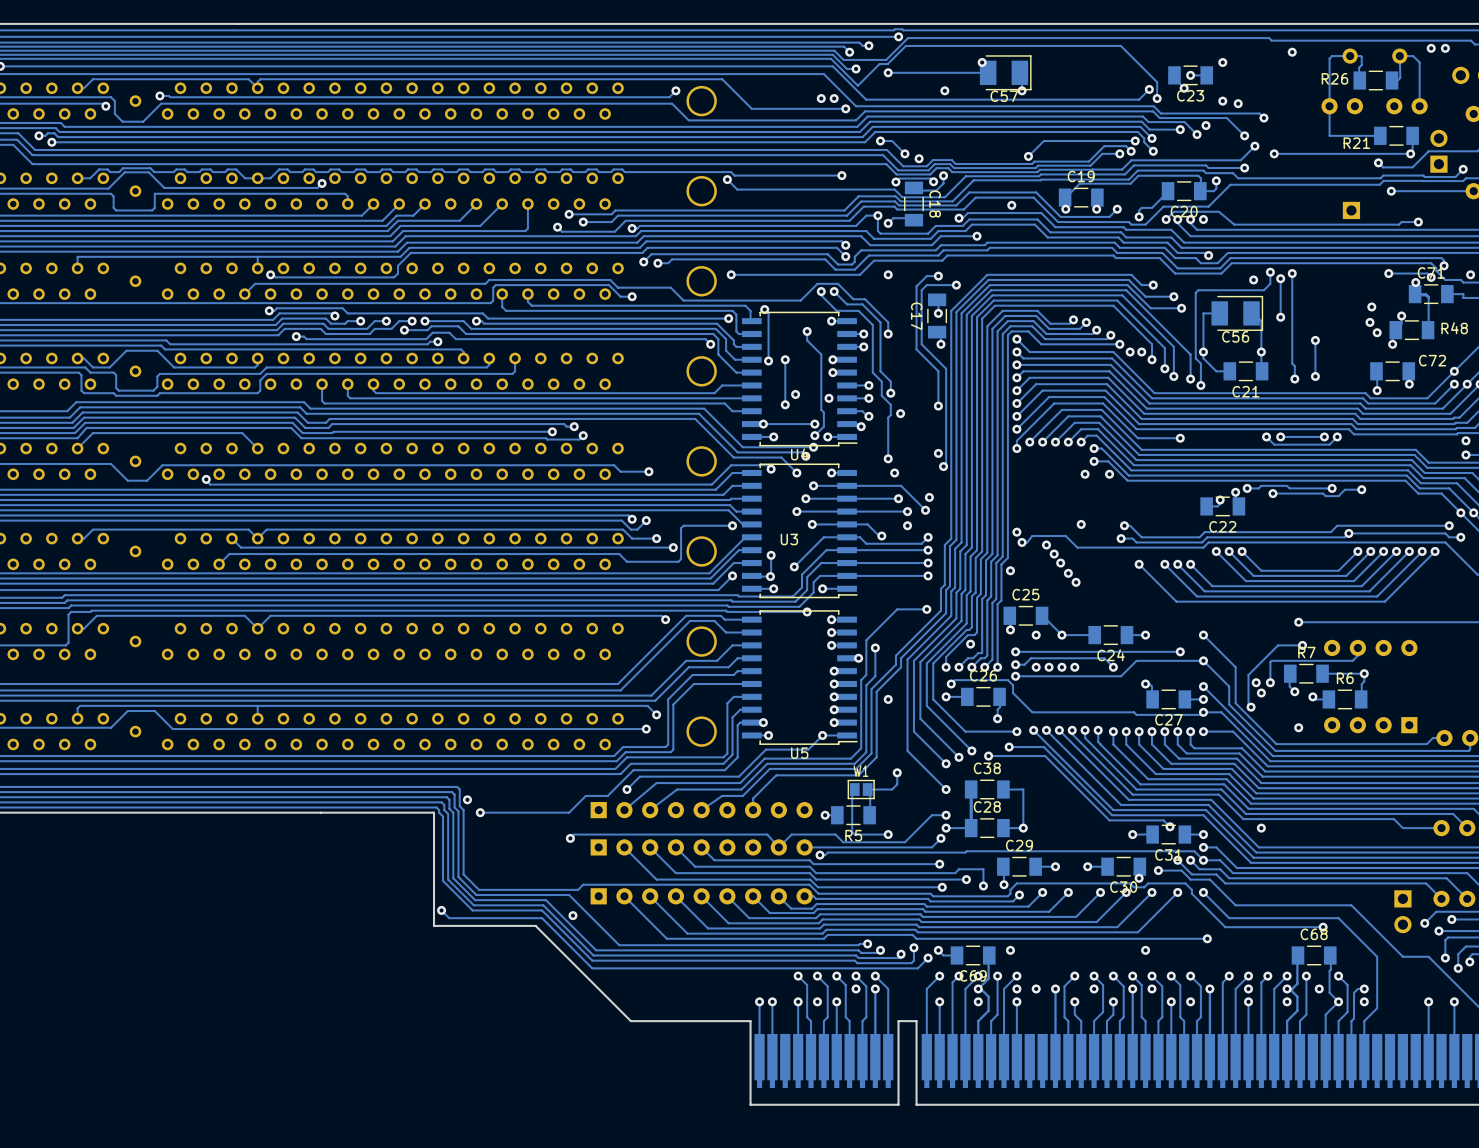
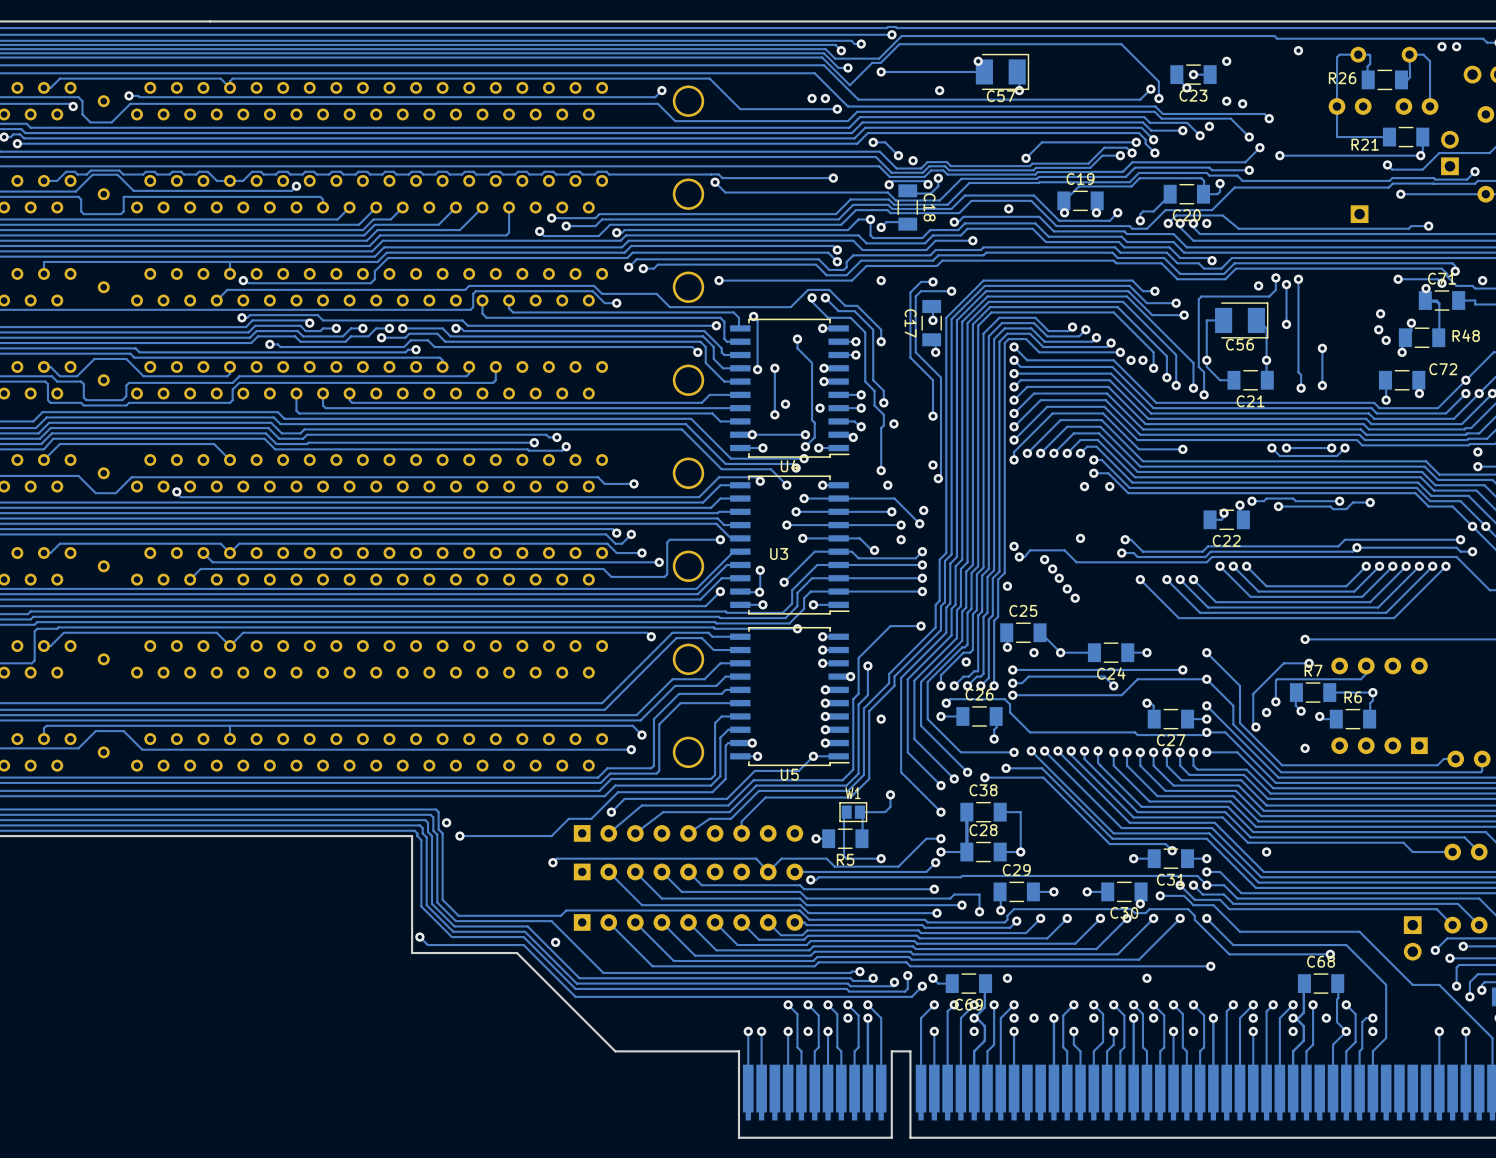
via: (1036, 667) -> none
via: (1049, 667) -> none
via: (1061, 667) -> none
via: (1074, 667) -> none
via: (1256, 682) -> none

